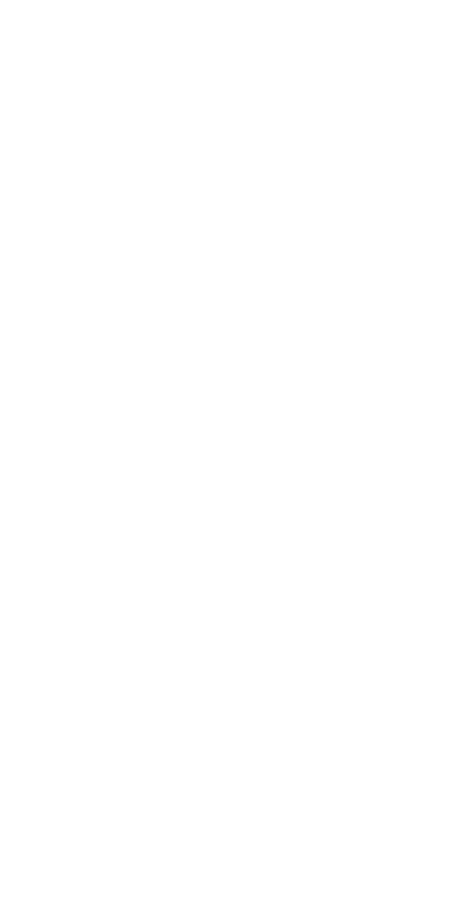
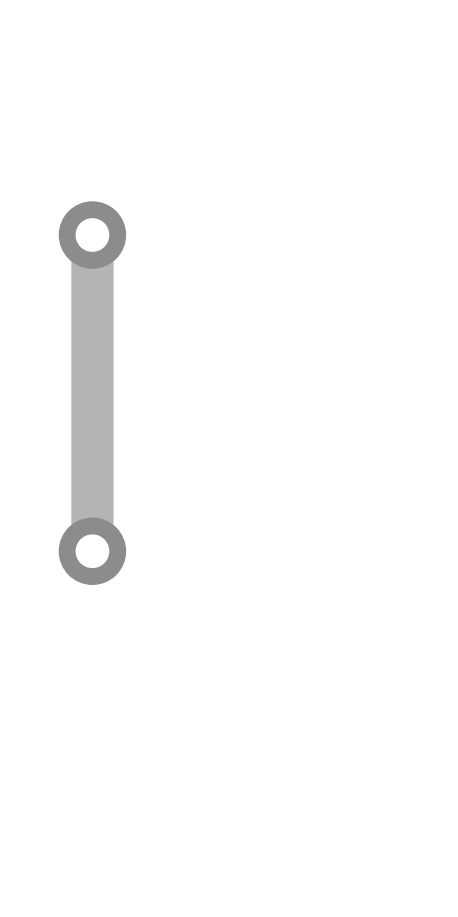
track: none -> (92, 235) (92, 551)
via: none -> (92, 235)
via: none -> (92, 551)

